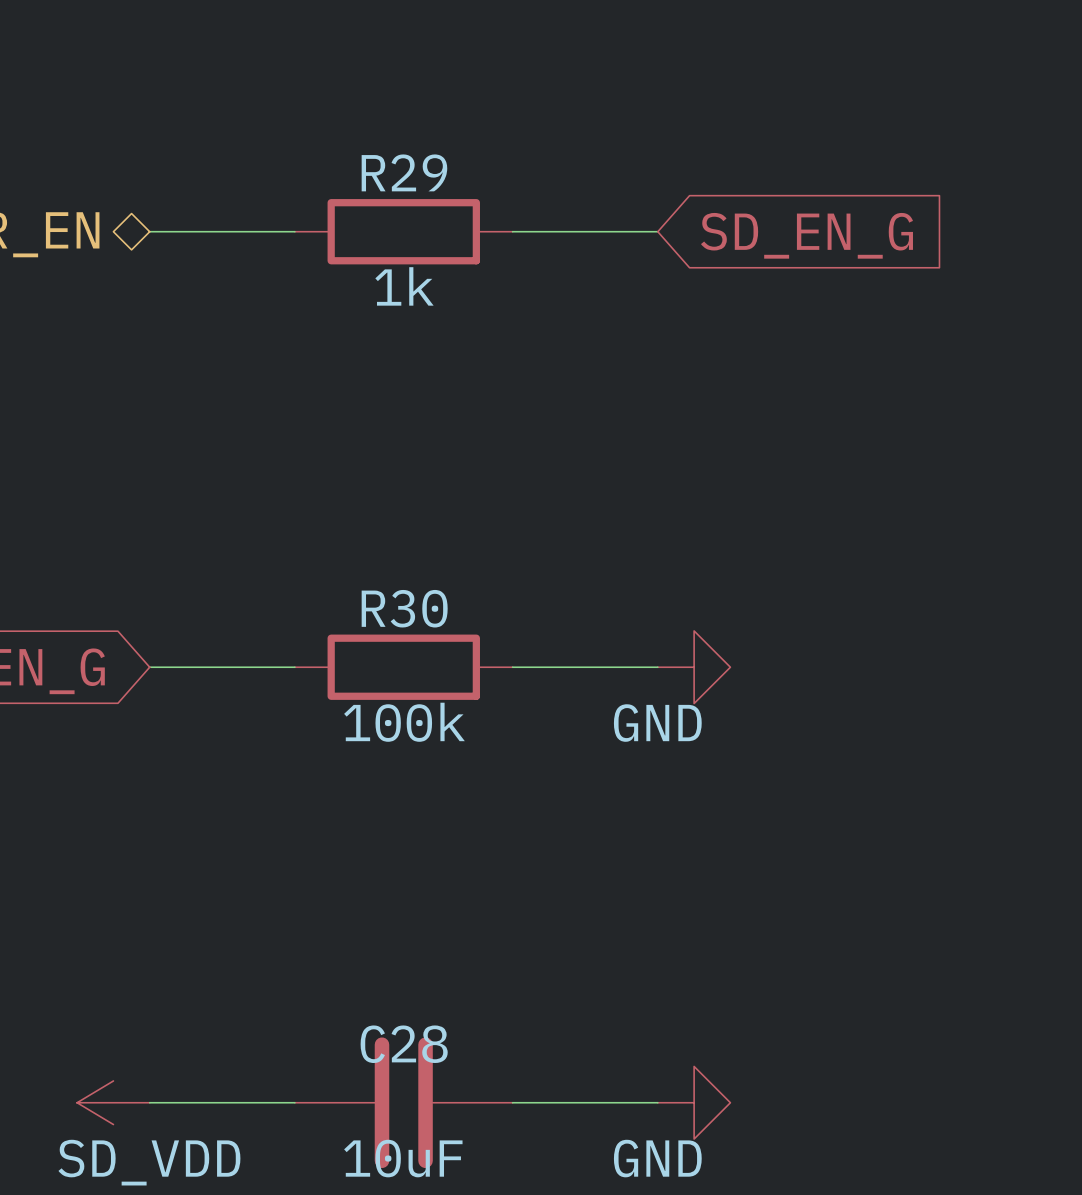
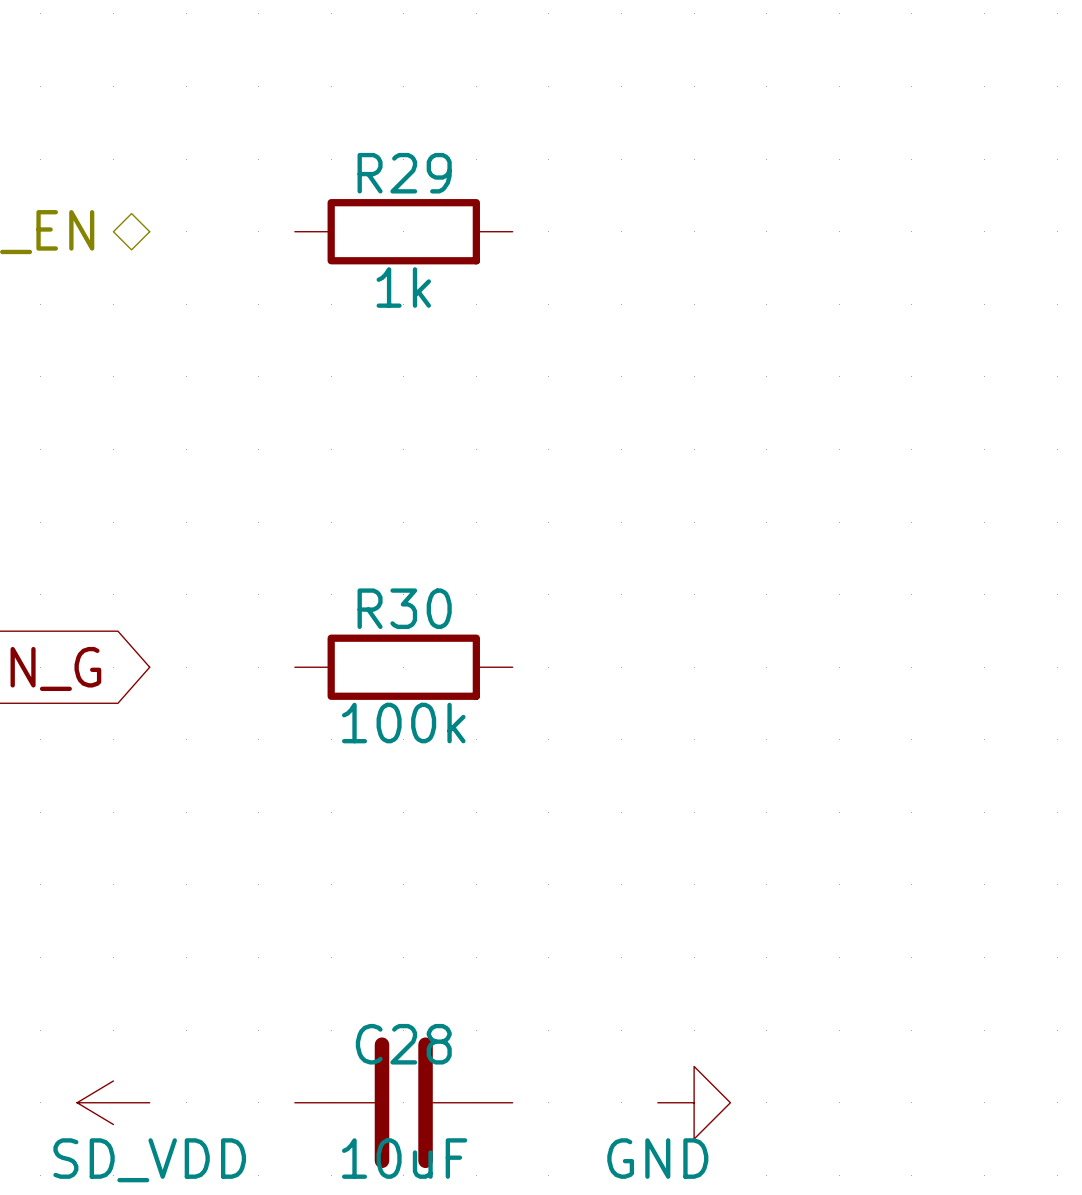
wire: (149, 231) (294, 231) -> none
wire: (512, 231) (657, 231) -> none
global label: SD_EN_G (806, 235) -> none
wire: (149, 667) (294, 667) -> none
wire: (512, 667) (657, 667) -> none
power symbol: GND (694, 667) -> none
wire: (149, 1102) (294, 1102) -> none
wire: (512, 1102) (657, 1102) -> none

